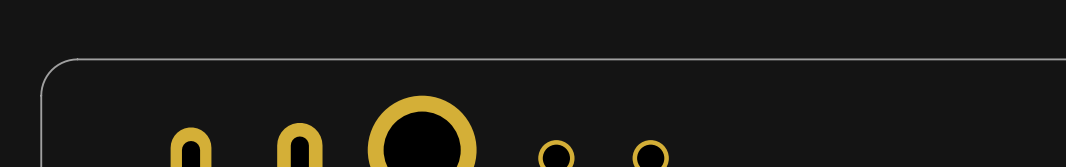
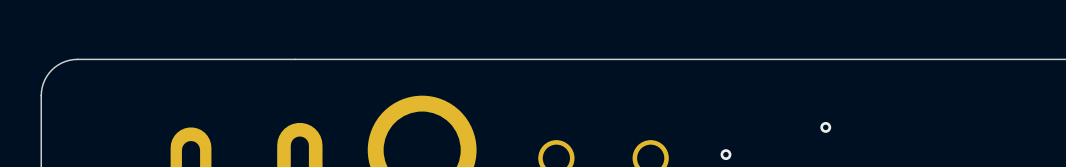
via: none -> (825, 127)
via: none -> (725, 154)

